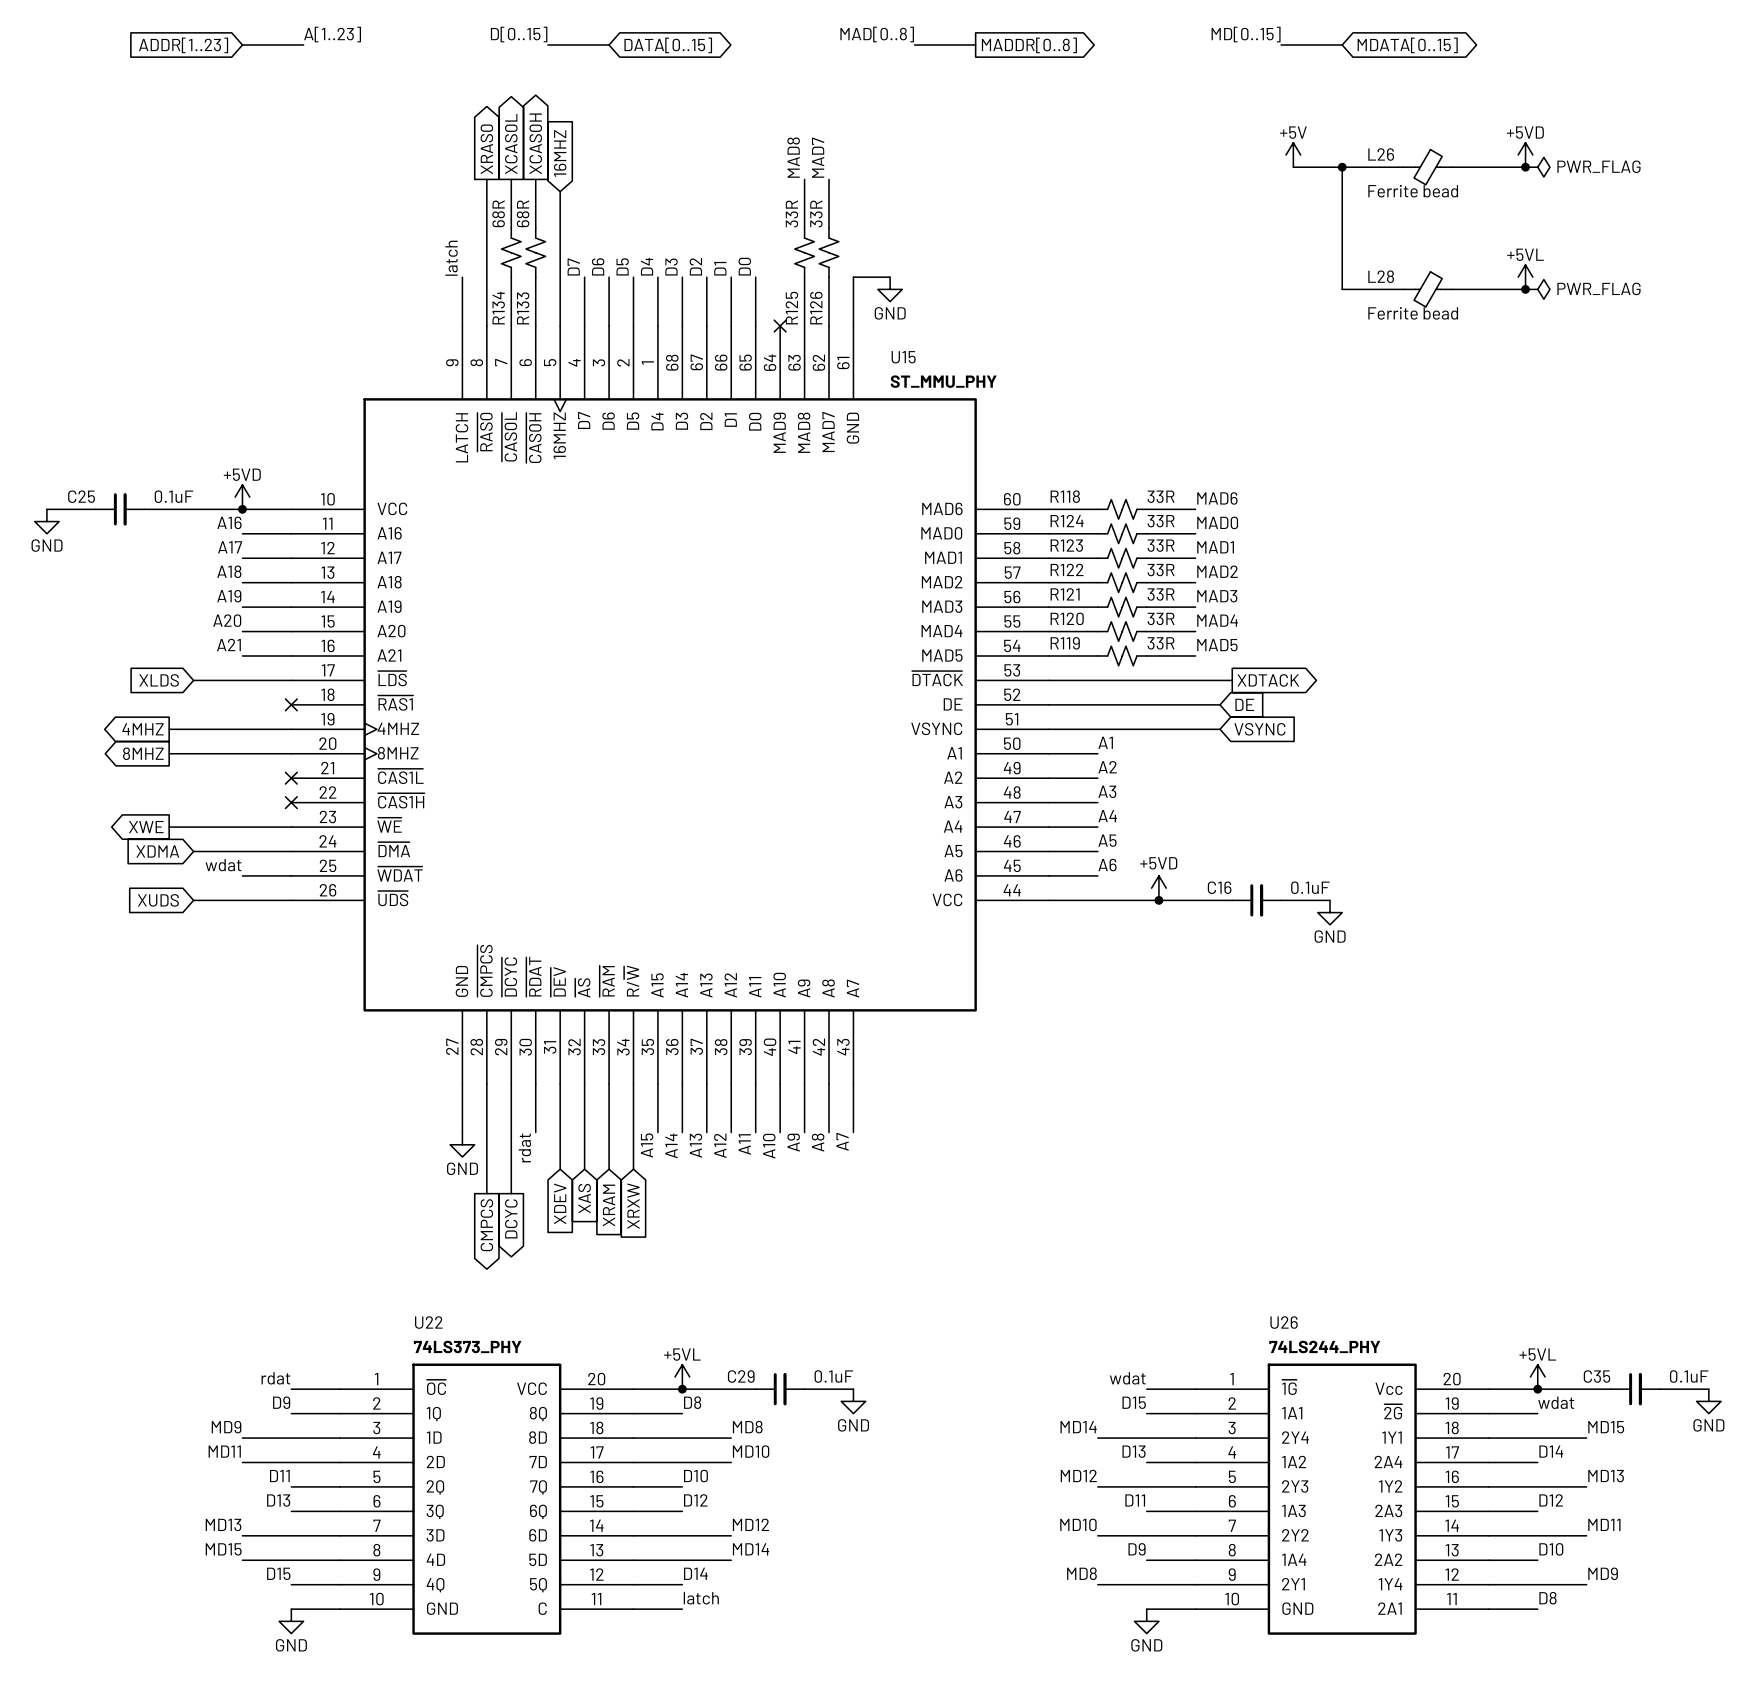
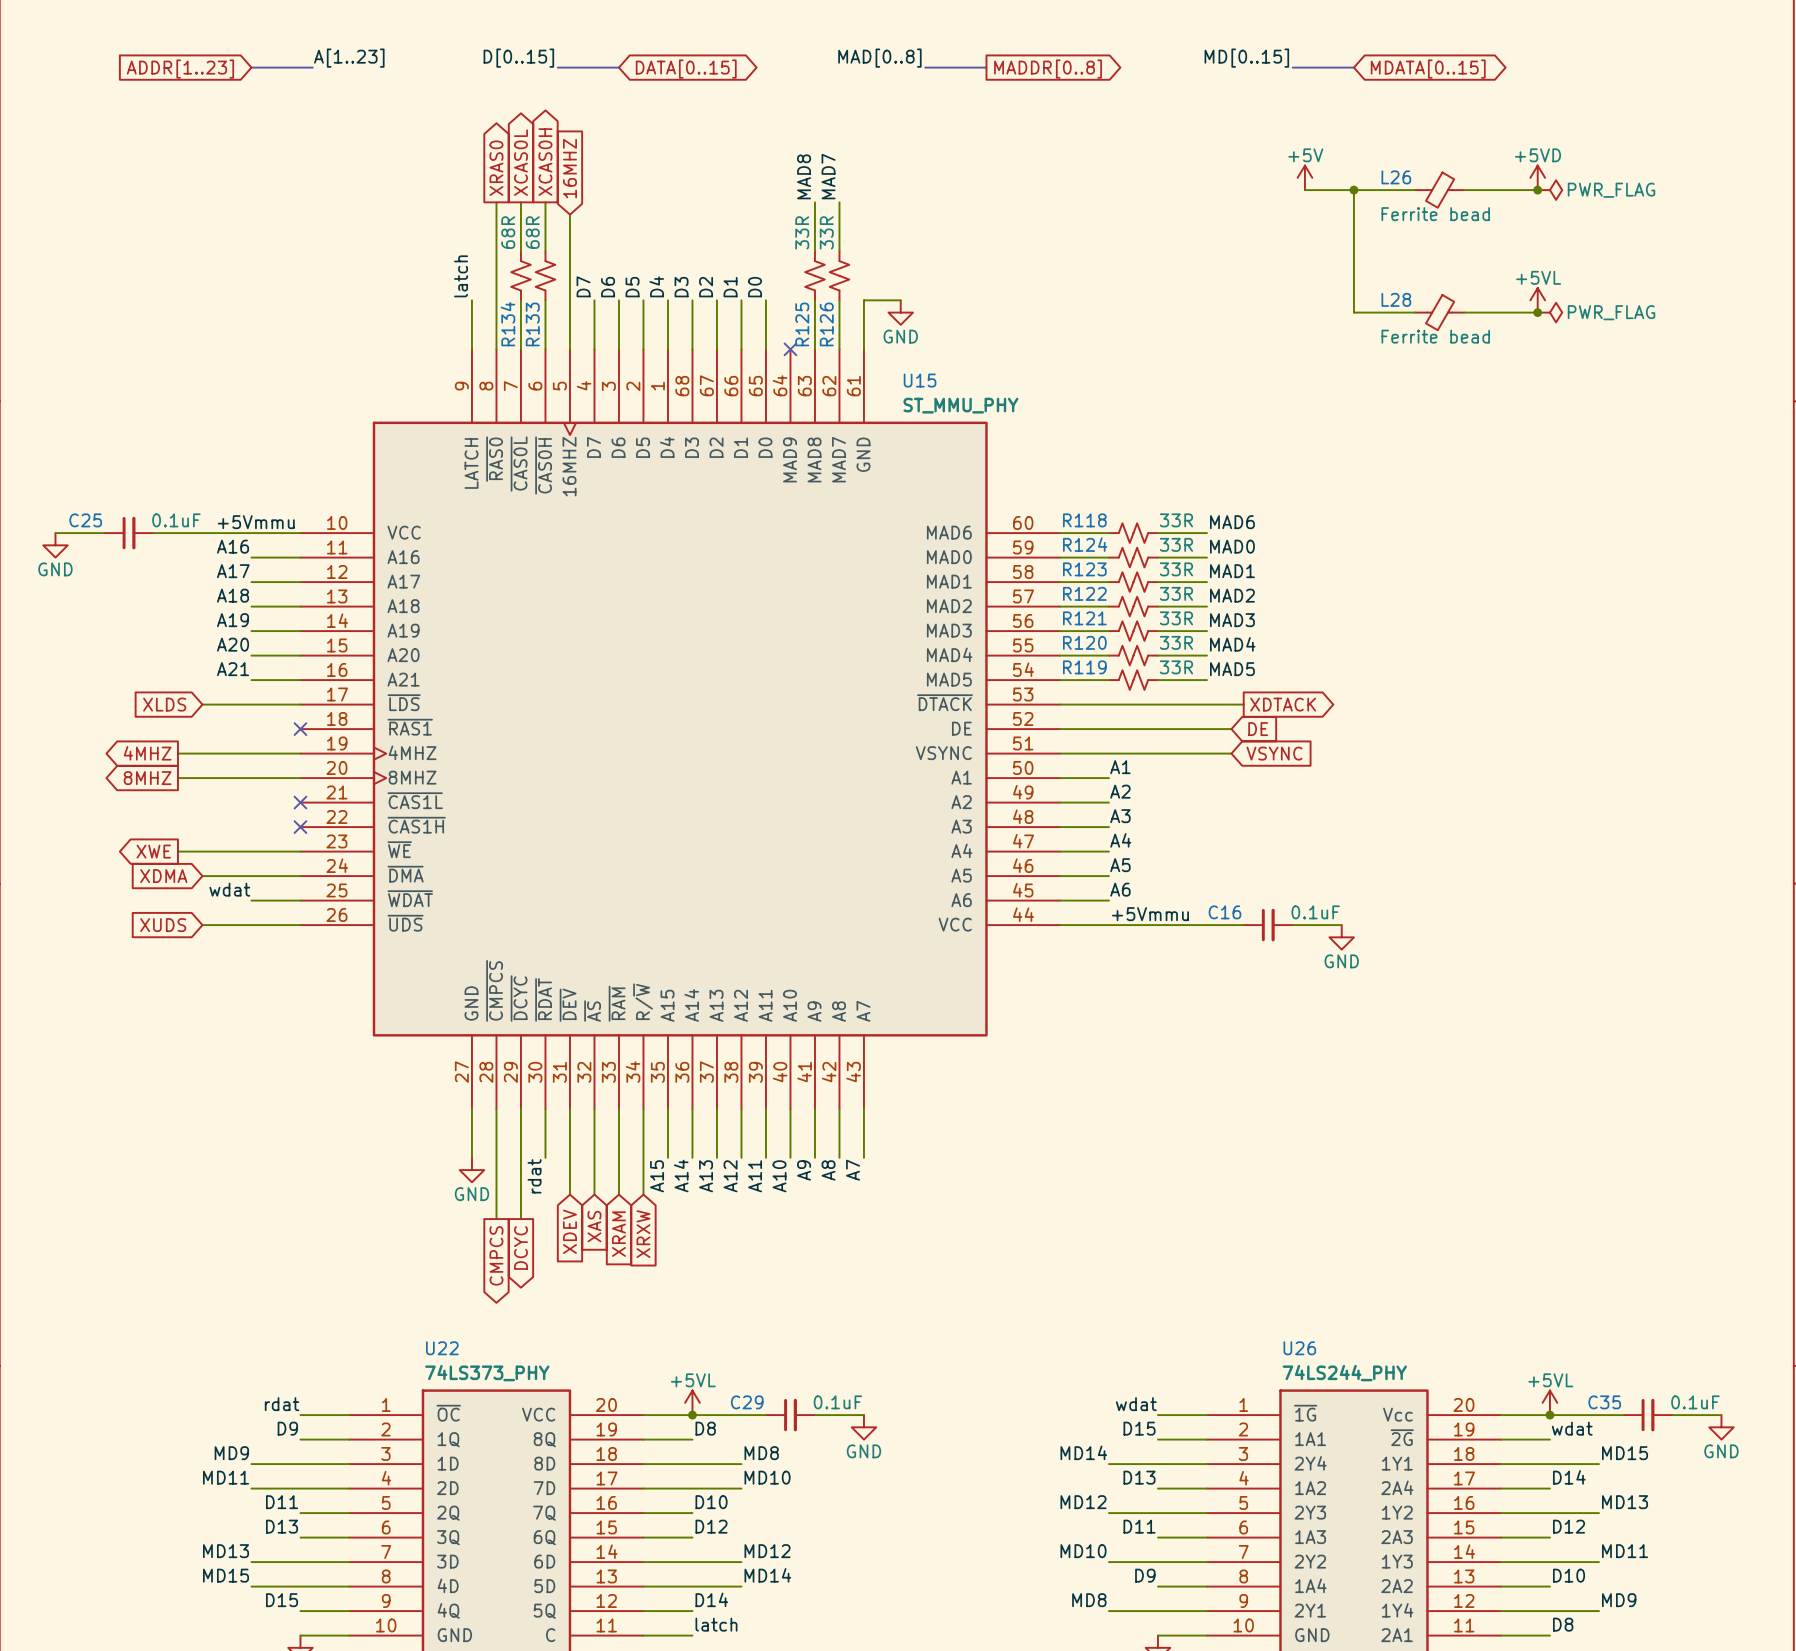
power symbol: +5VD (242, 497) -> none
label: none -> +5Vmmu (256, 522)
junction: (242, 509) -> none
power symbol: +5VD (1158, 888) -> none
label: none -> +5Vmmu (1150, 914)
junction: (1158, 900) -> none

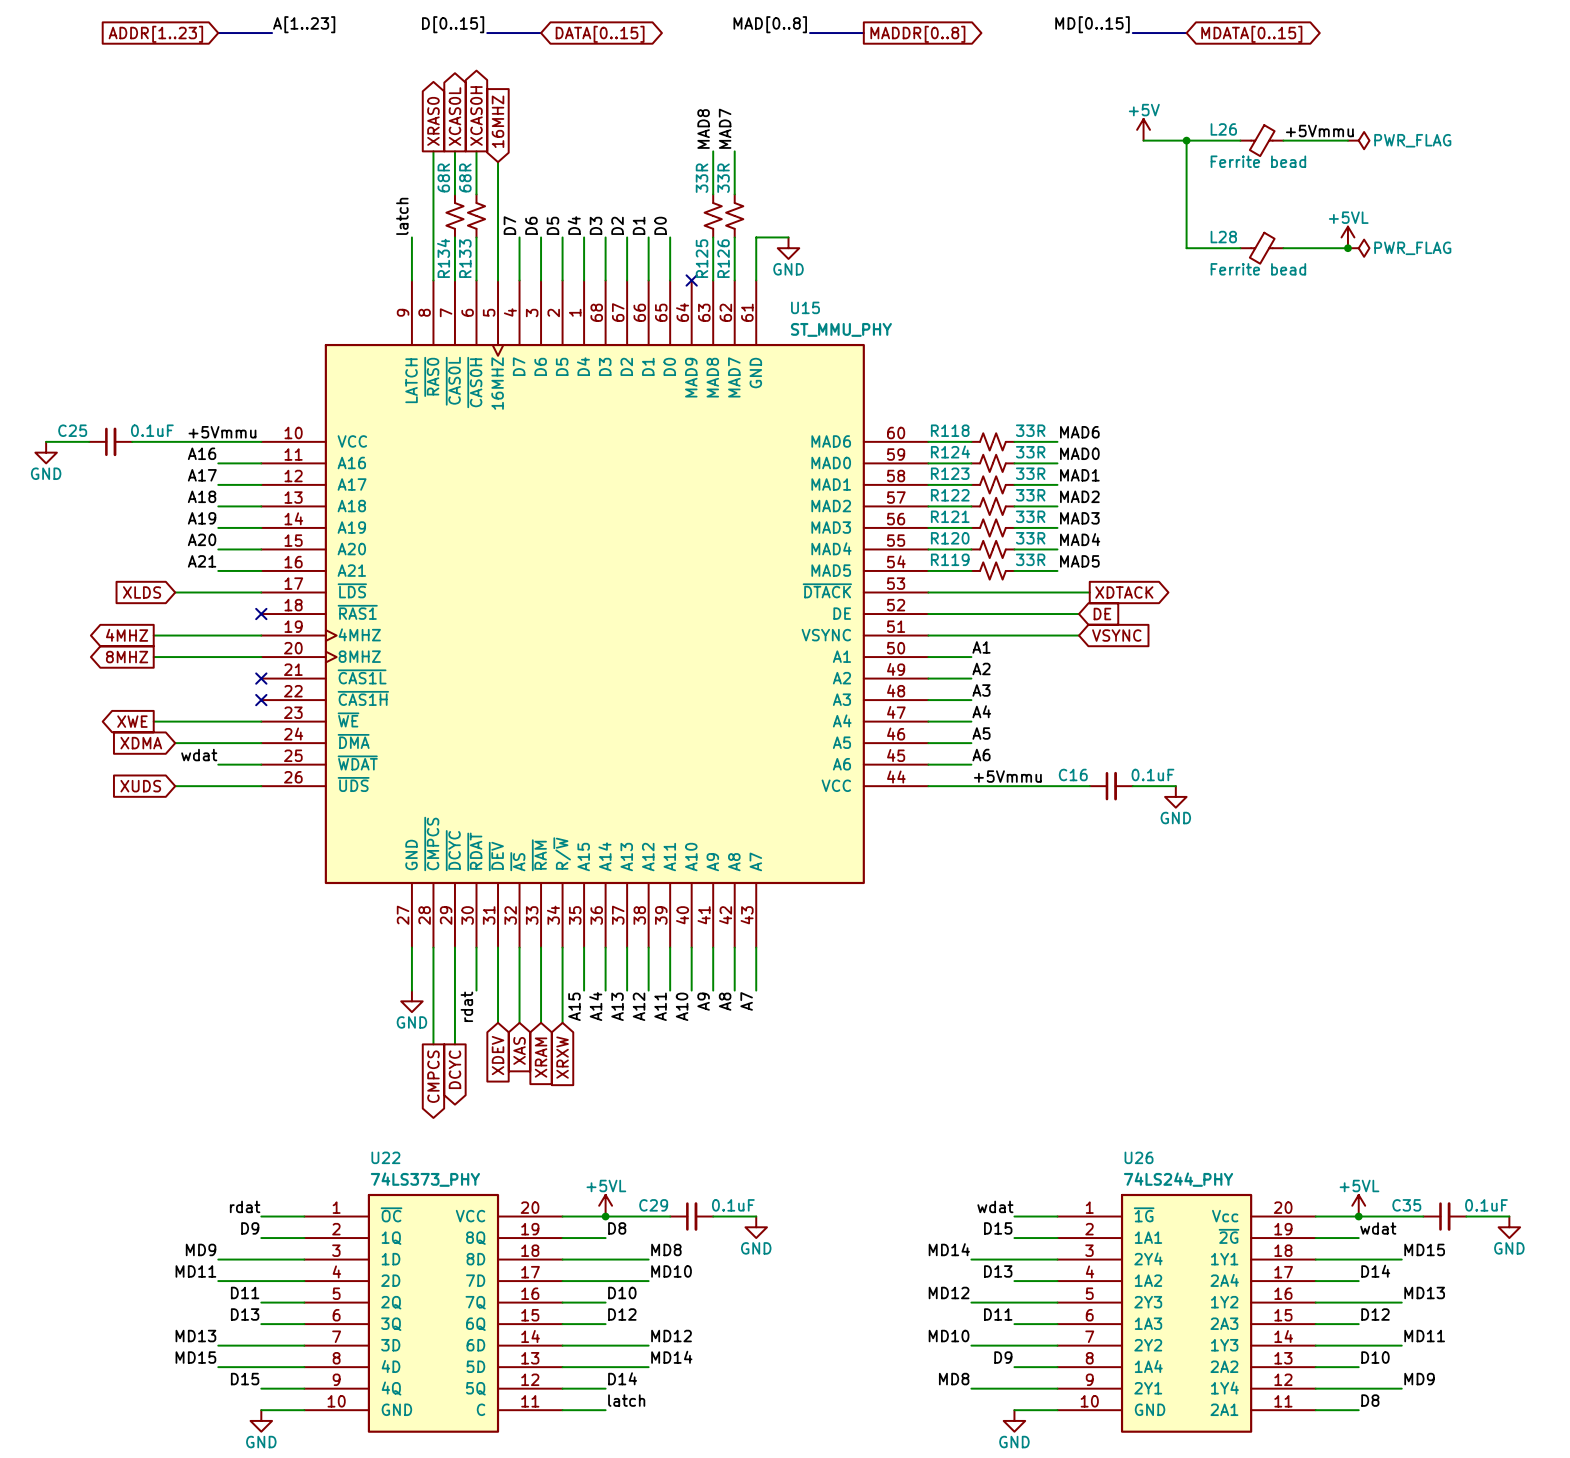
power symbol: +5VD (1537, 177) -> none
label: none -> +5Vmmu (1319, 131)
junction: (1537, 190) -> none

